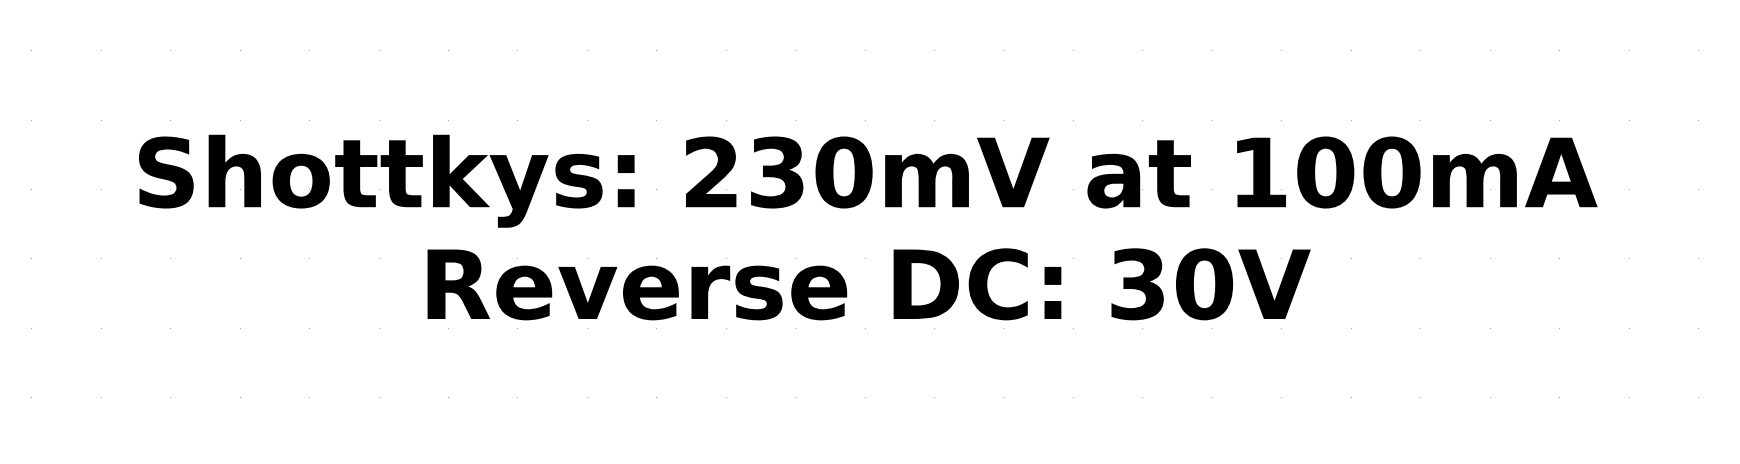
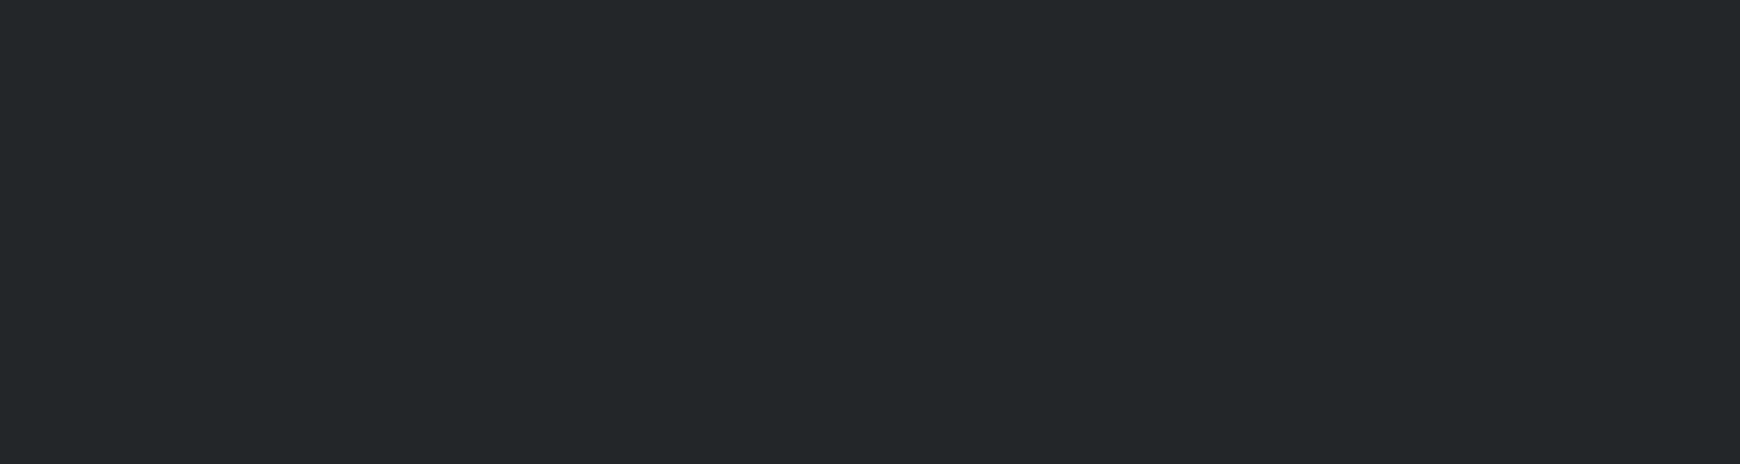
text: Shottkys: 230mV at 100mA (868, 181) -> none
text: Reverse DC: 30V (869, 284) -> none

